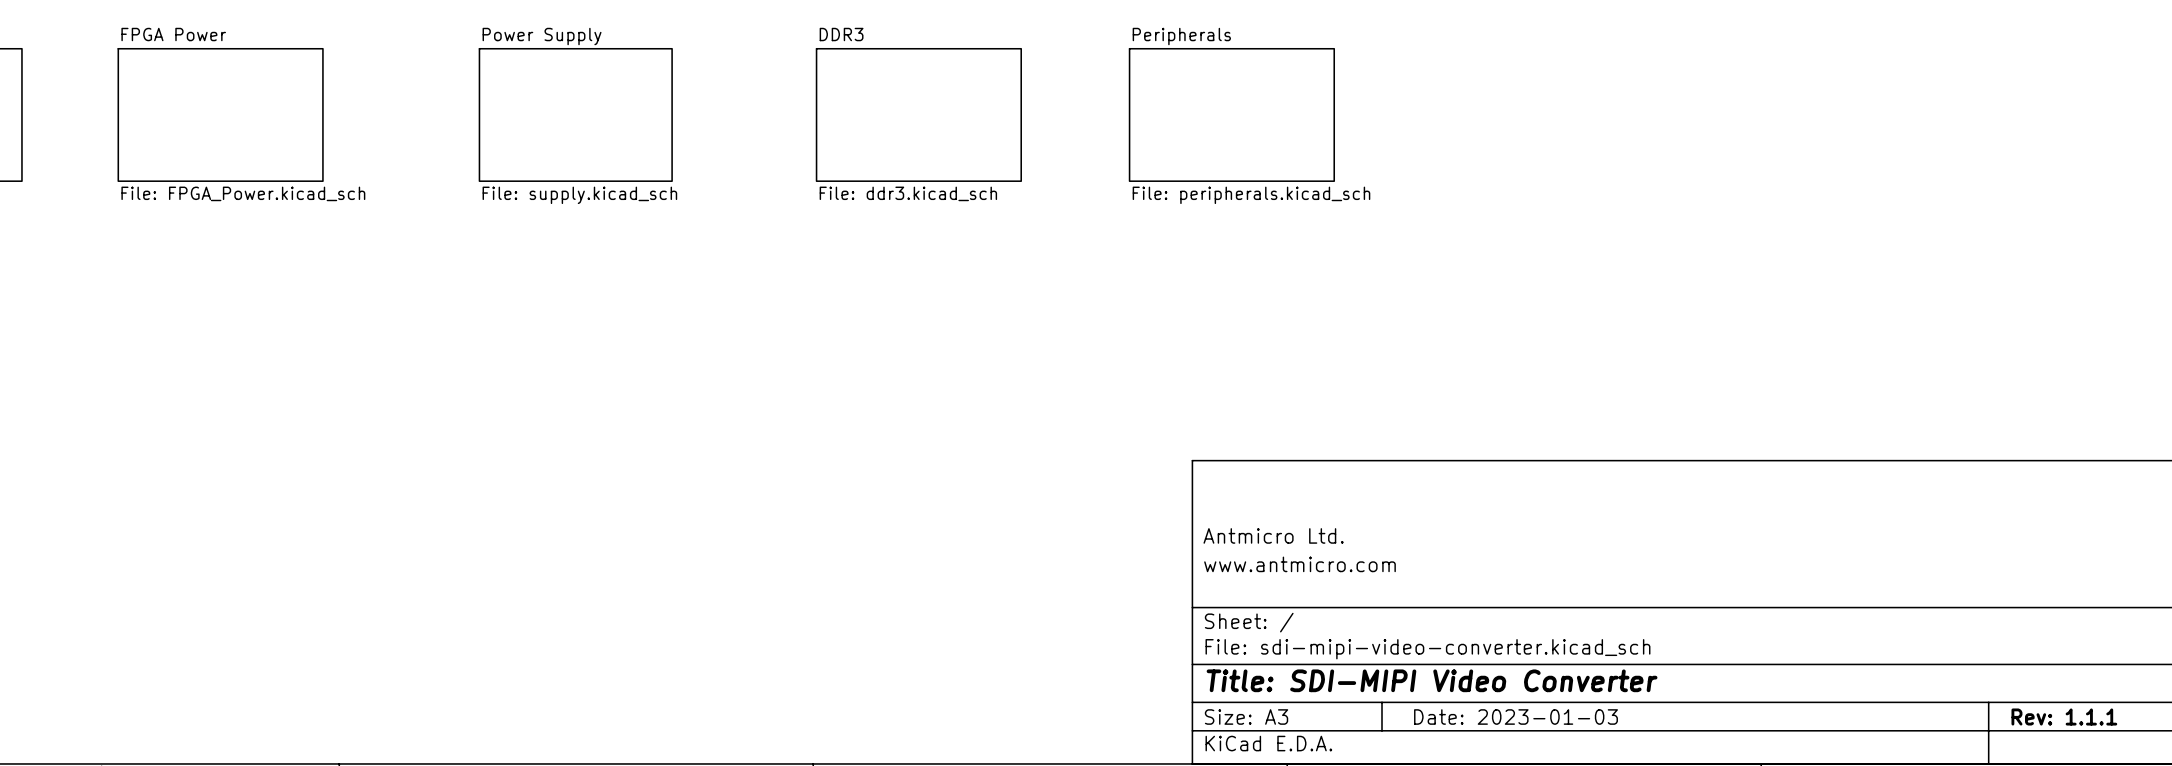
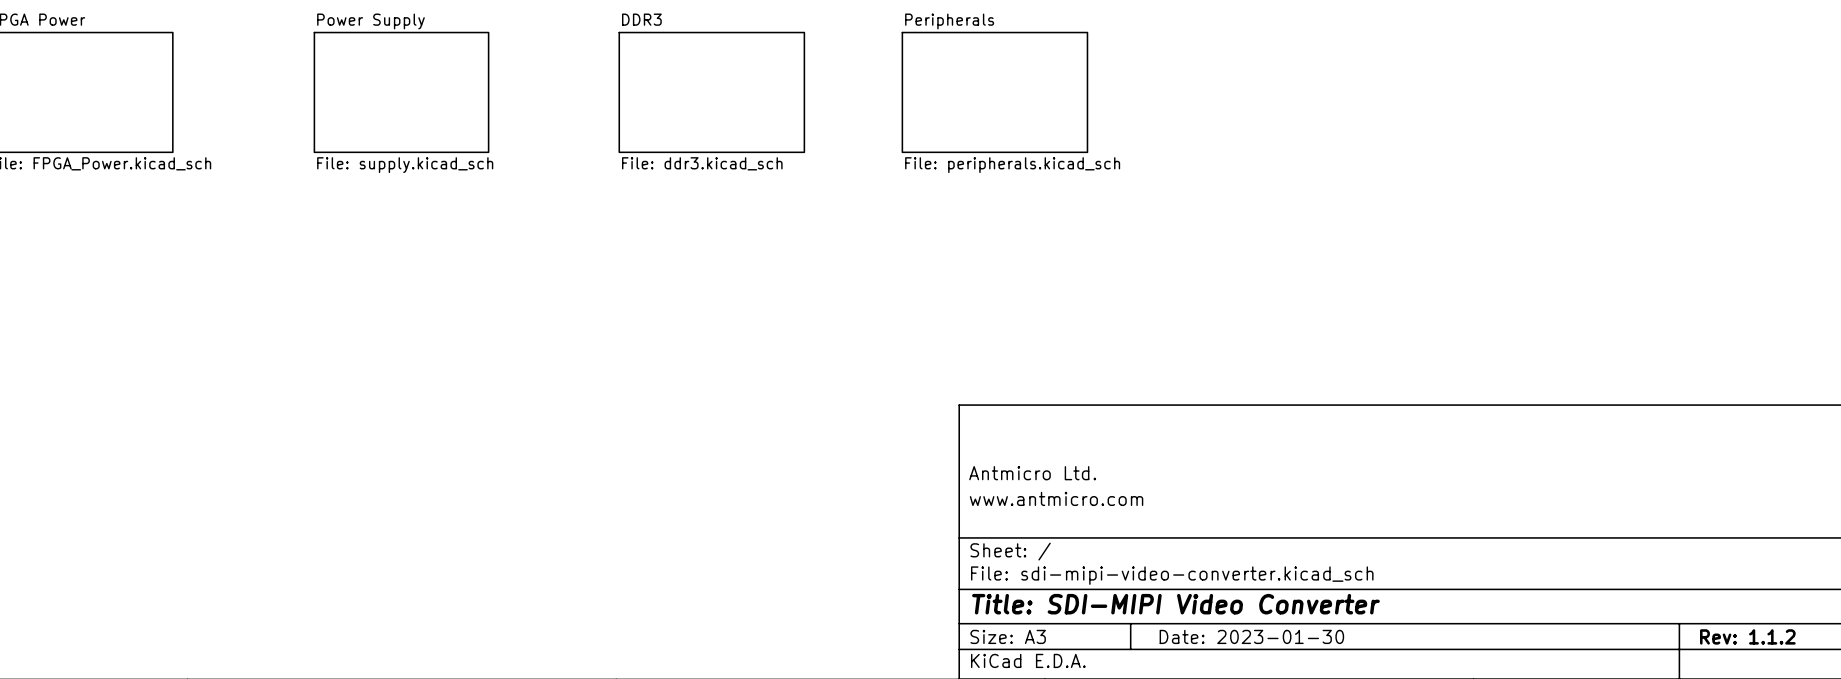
title block: Date: 2023-01-03 (1516, 717) -> Date: 2023-01-30 (1251, 636)
title block: Rev: 1.1.1 (2064, 717) -> Rev: 1.1.2 (1747, 636)

